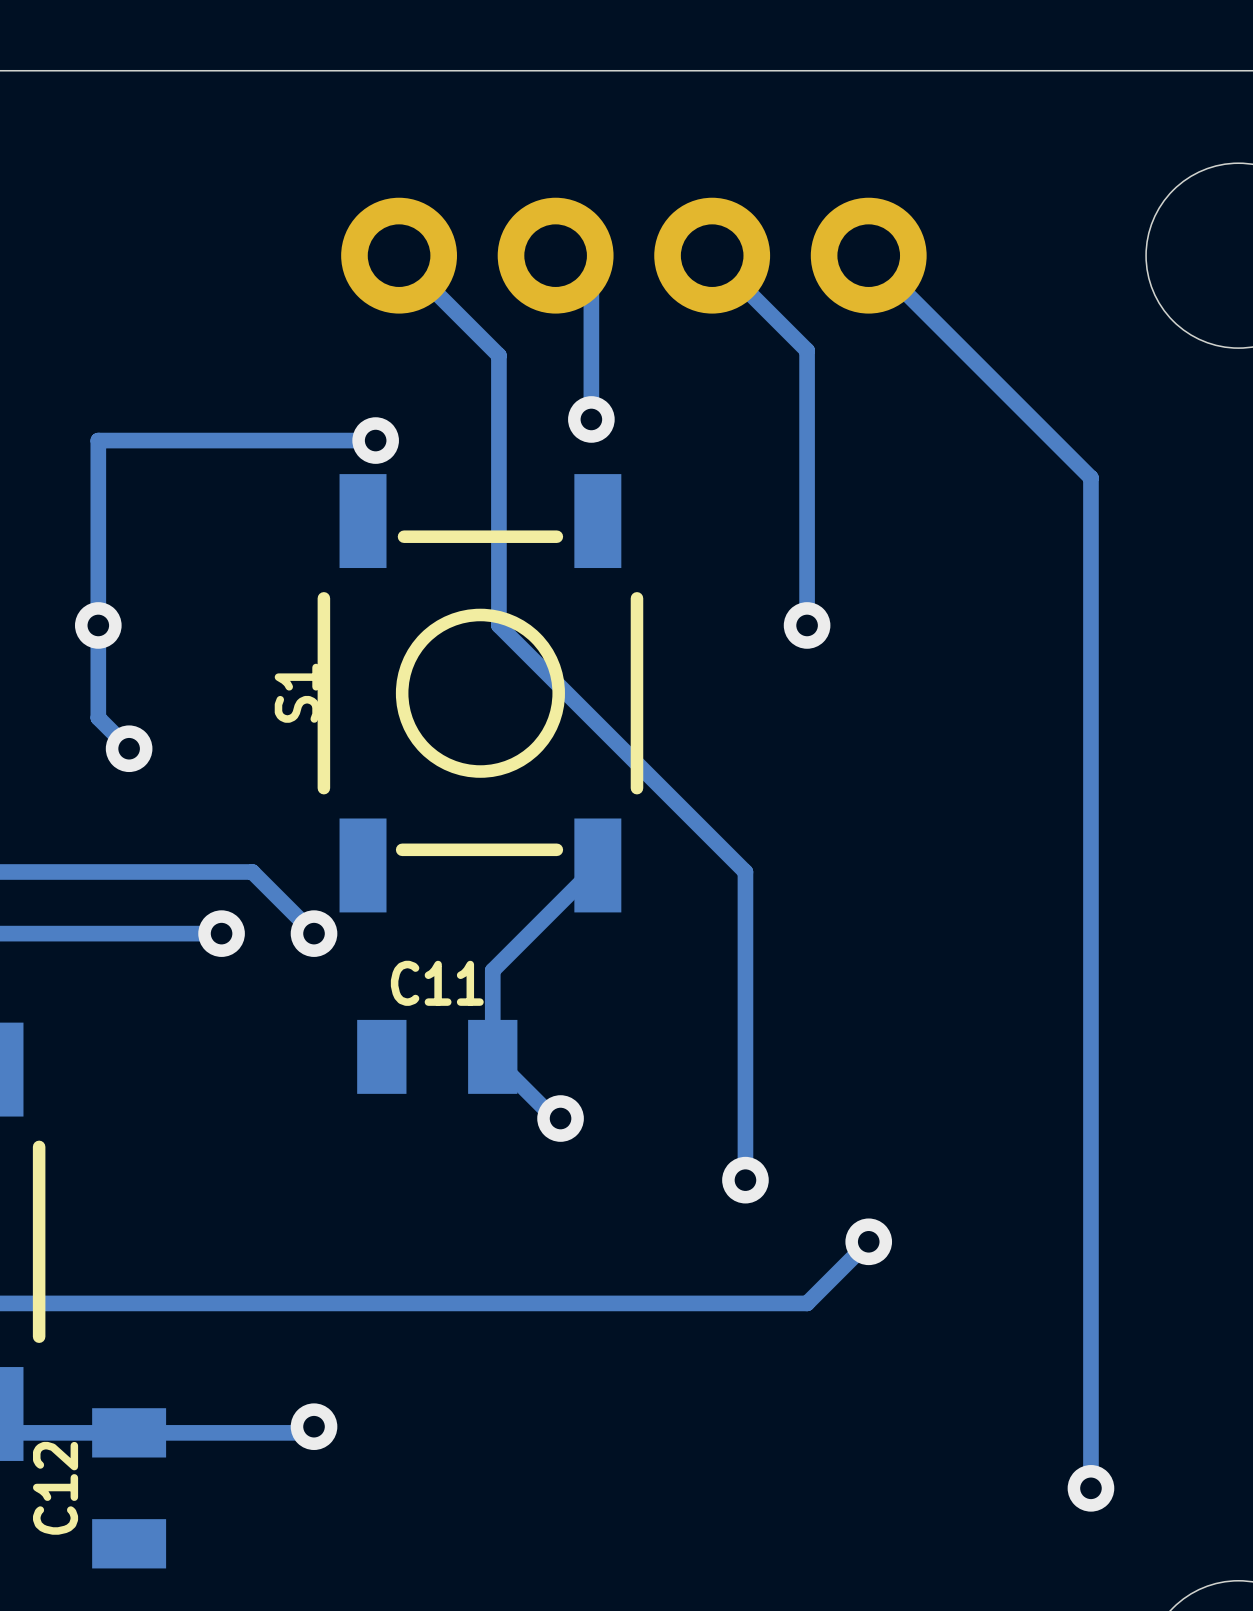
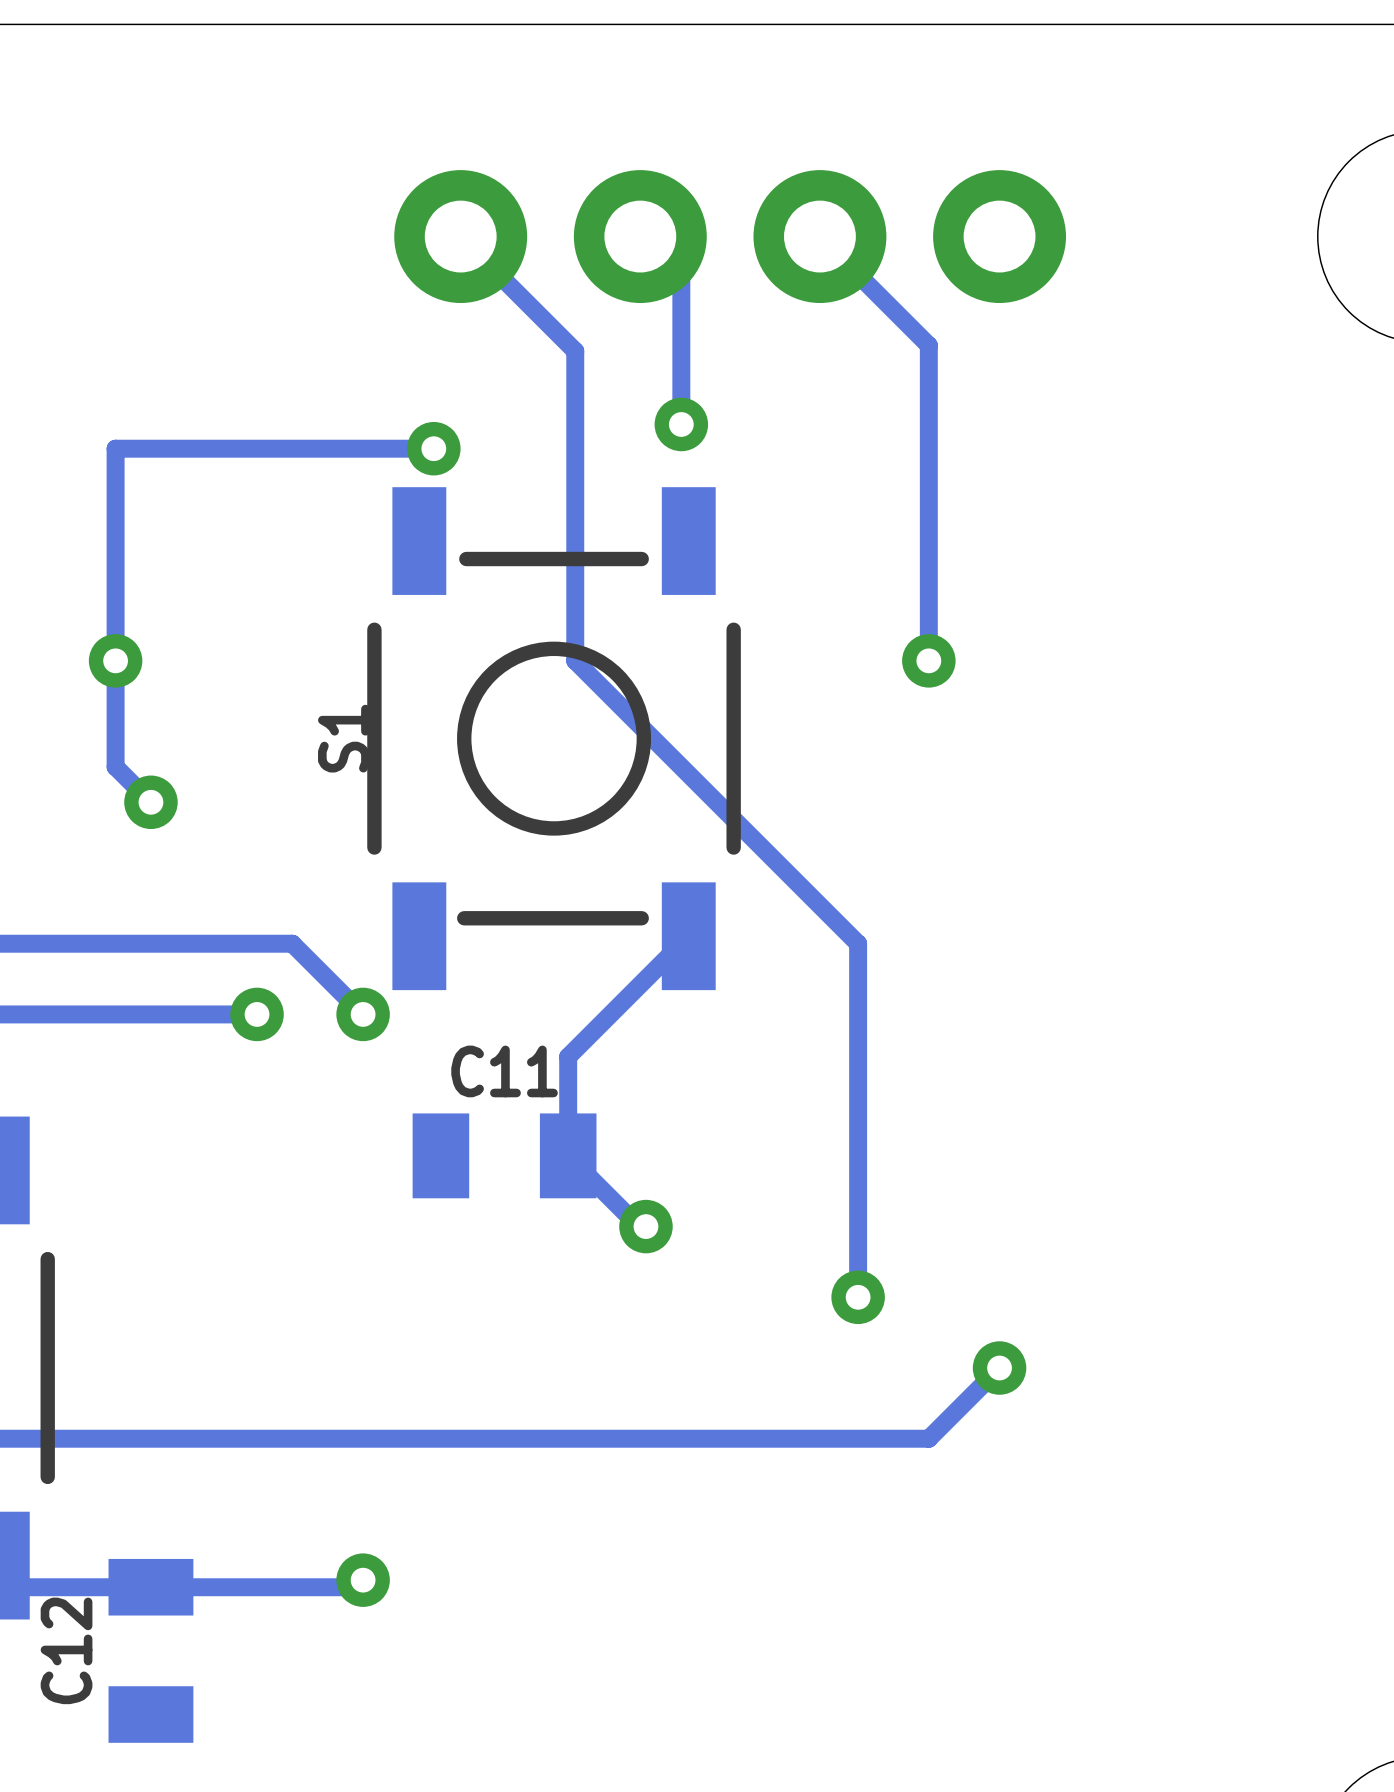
track: (868, 255) (1090, 477) (1090, 1488) -> none
via: (1090, 1488) -> none

